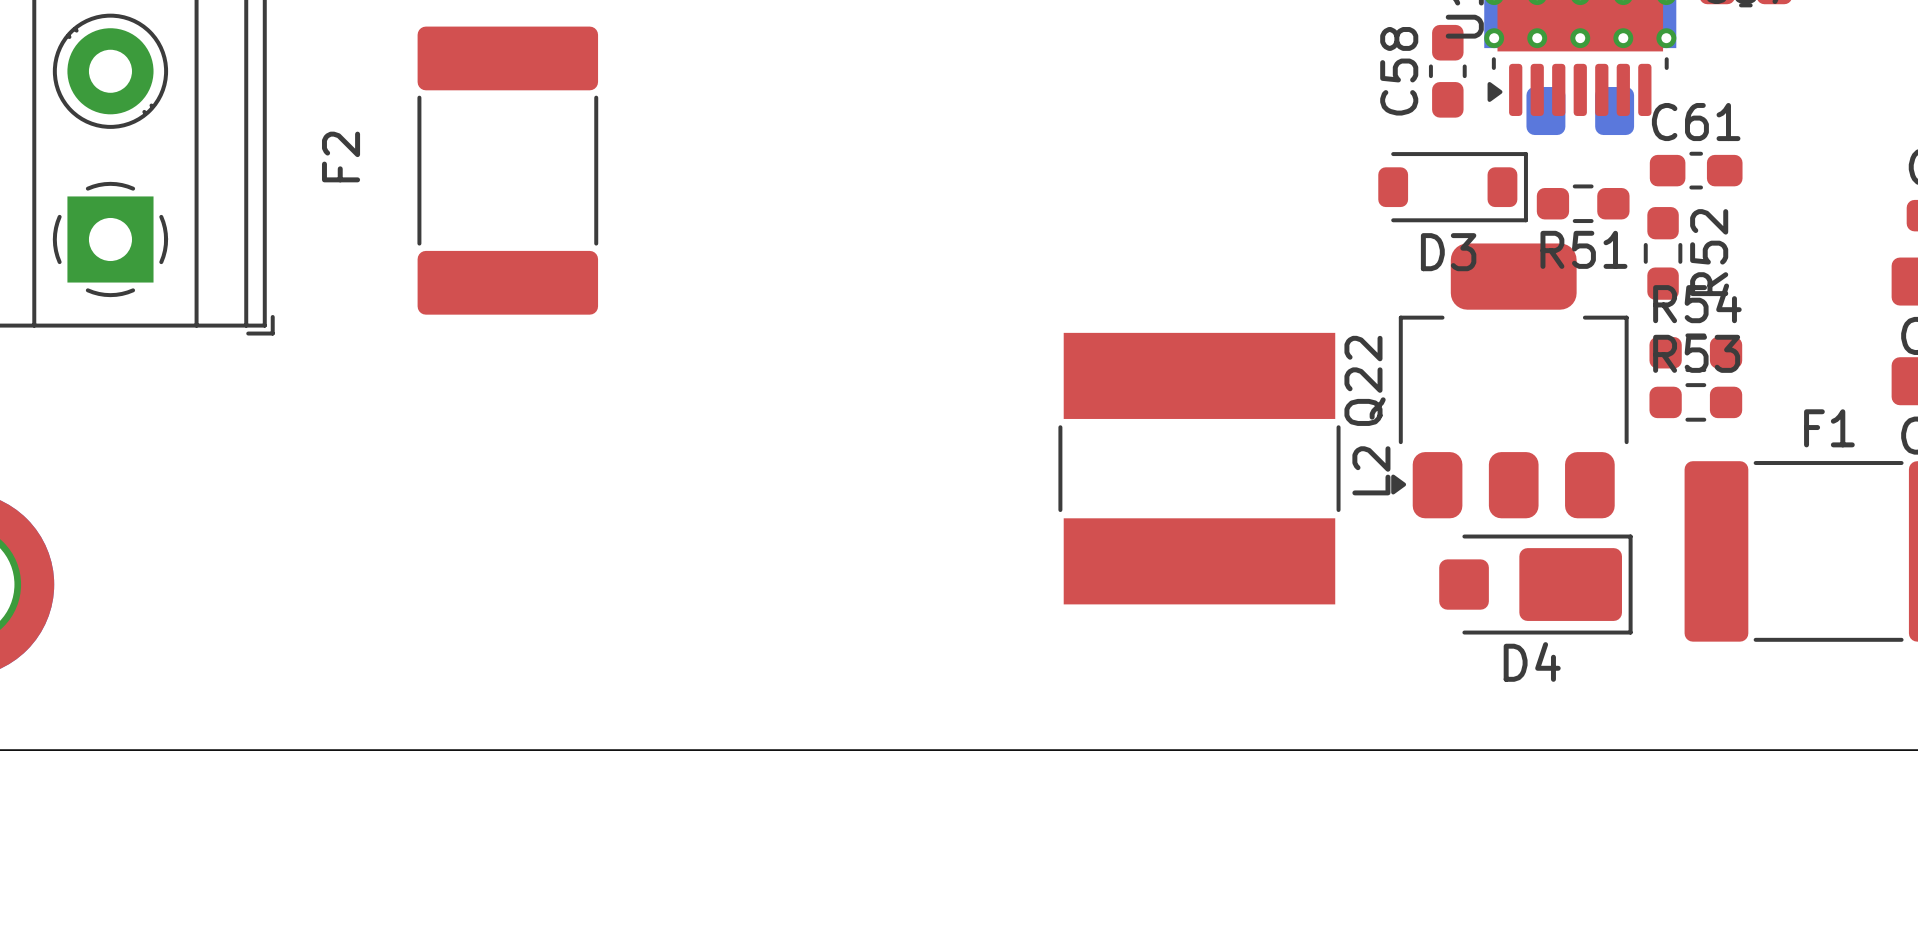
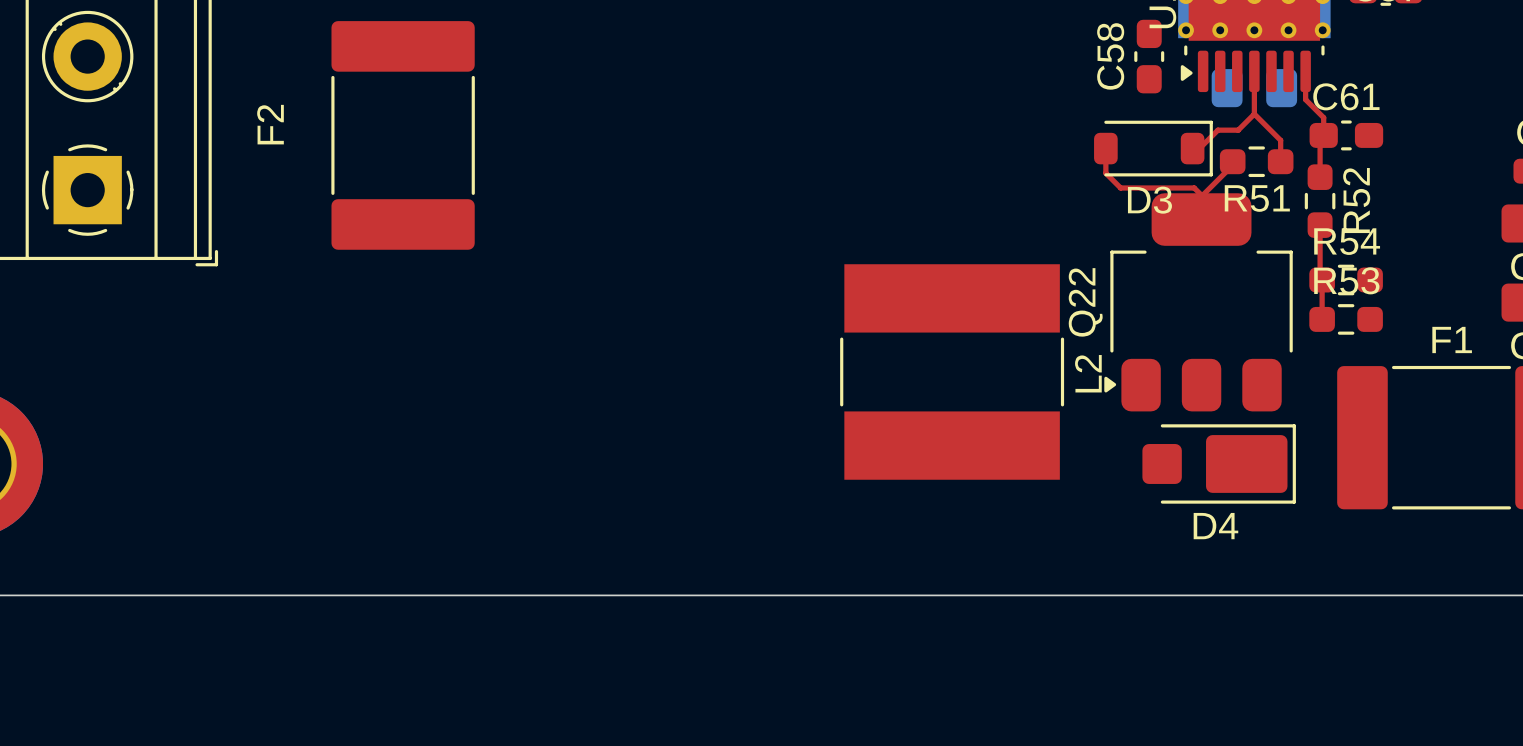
top track: none -> (1254, 71) (1254, 114)
top track: none -> (1305, 71) (1305, 99) (1323, 117) (1323, 135) (1320, 139) (1320, 177)
top track: none -> (1254, 114) (1280, 140) (1280, 161)
top track: none -> (1254, 114) (1238, 130) (1217, 130) (1199, 148) (1192, 148)
top track: none -> (1105, 148) (1105, 173) (1120, 188) (1194, 188) (1201, 195) (1201, 219)
top track: none -> (1232, 161) (1232, 165) (1201, 196)
top track: none -> (1320, 225) (1322, 319)

